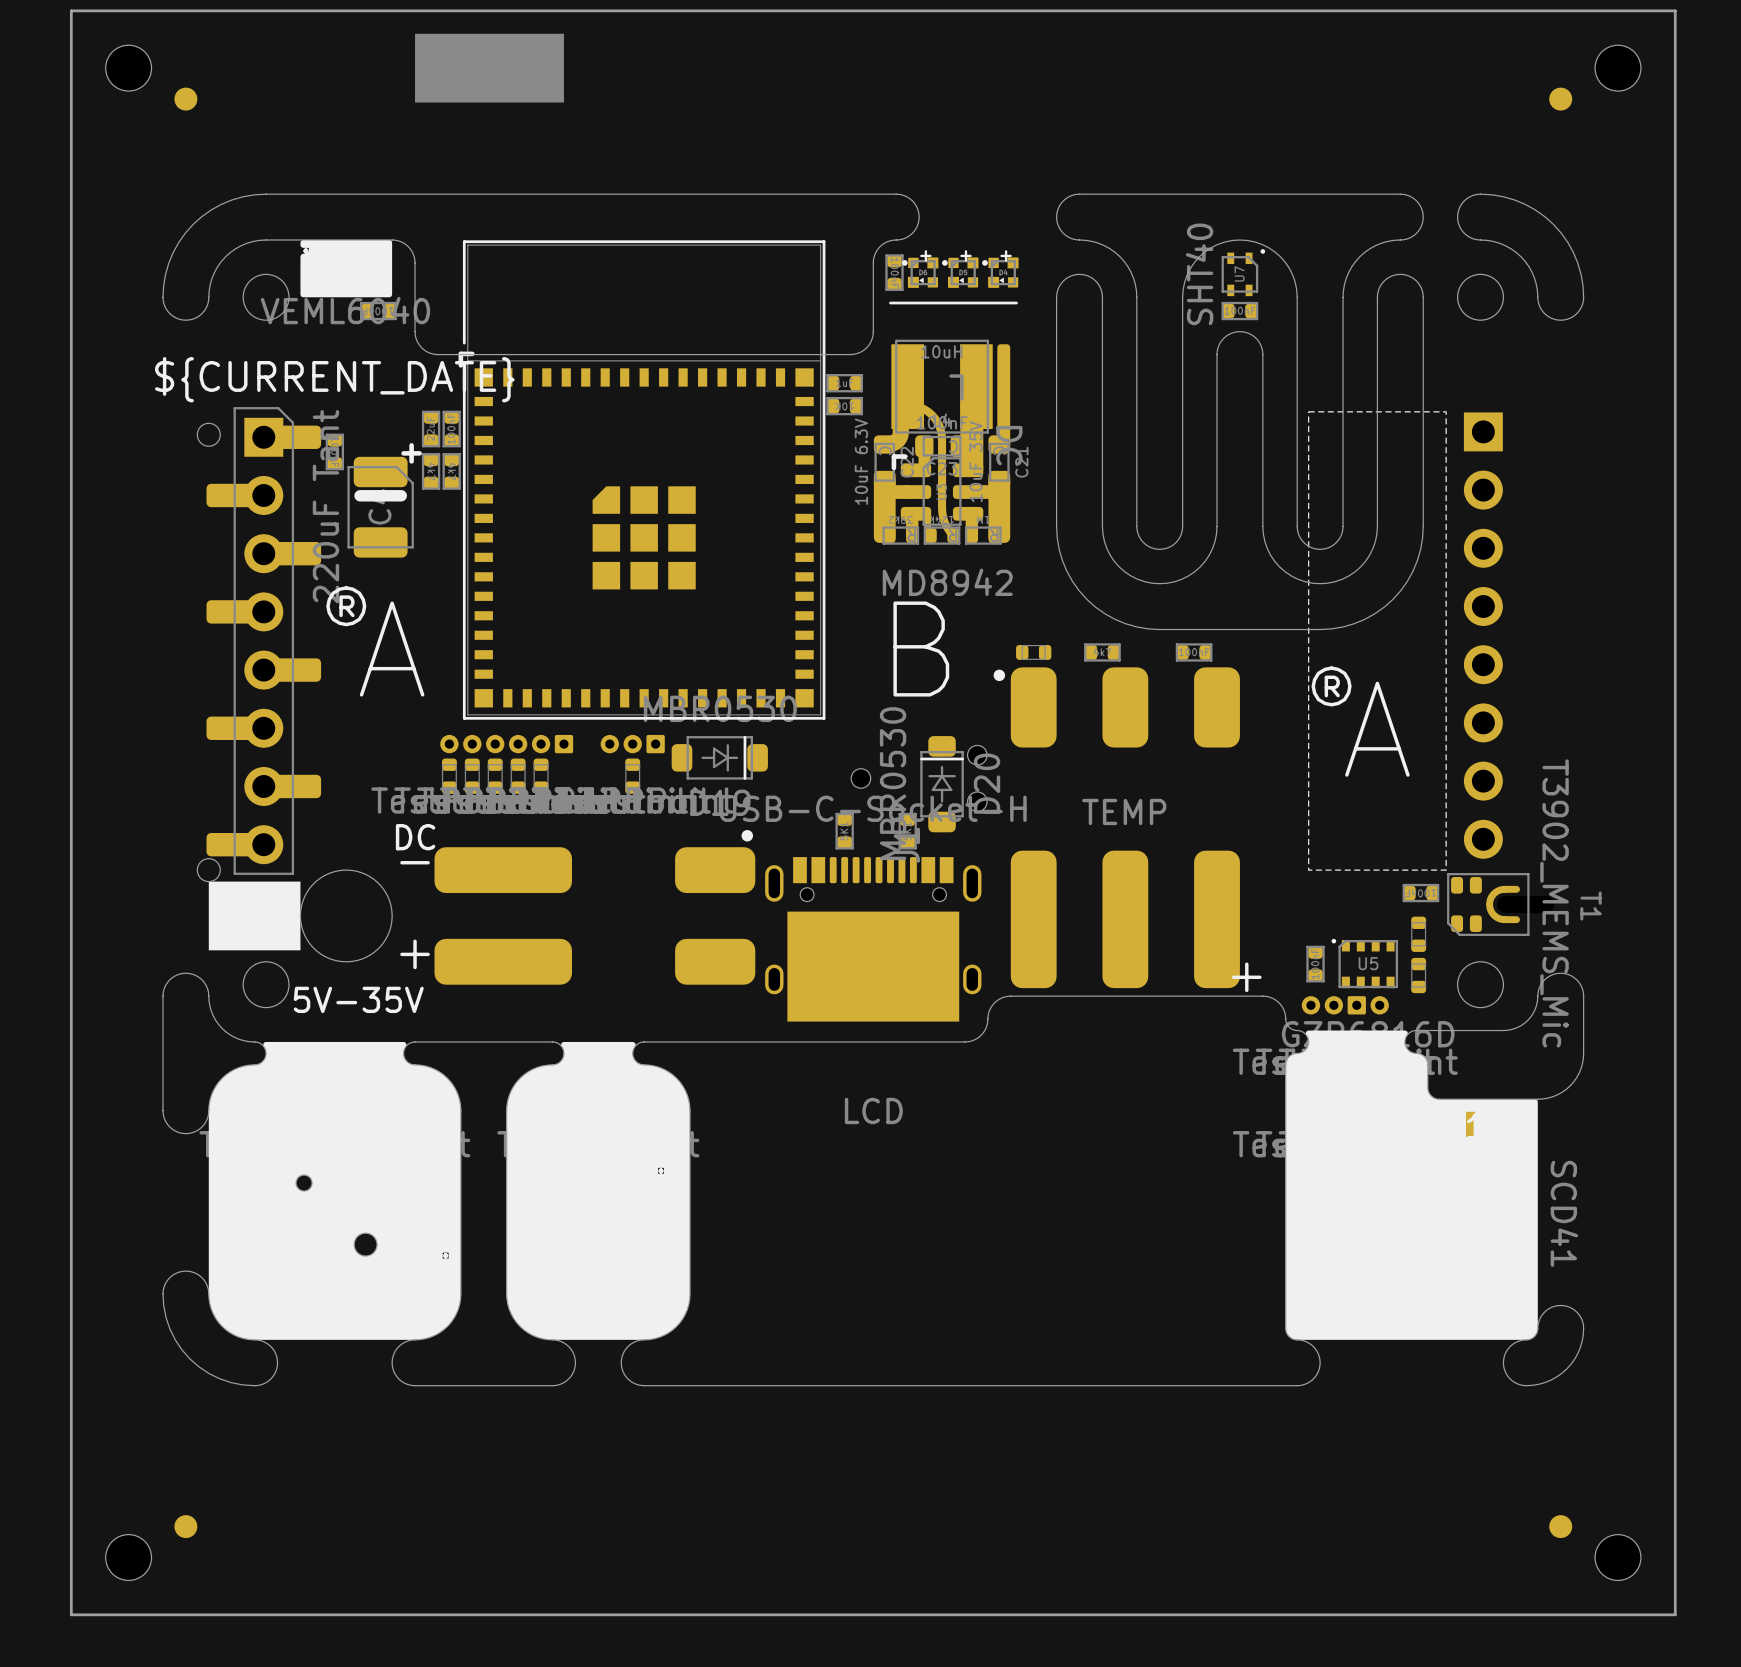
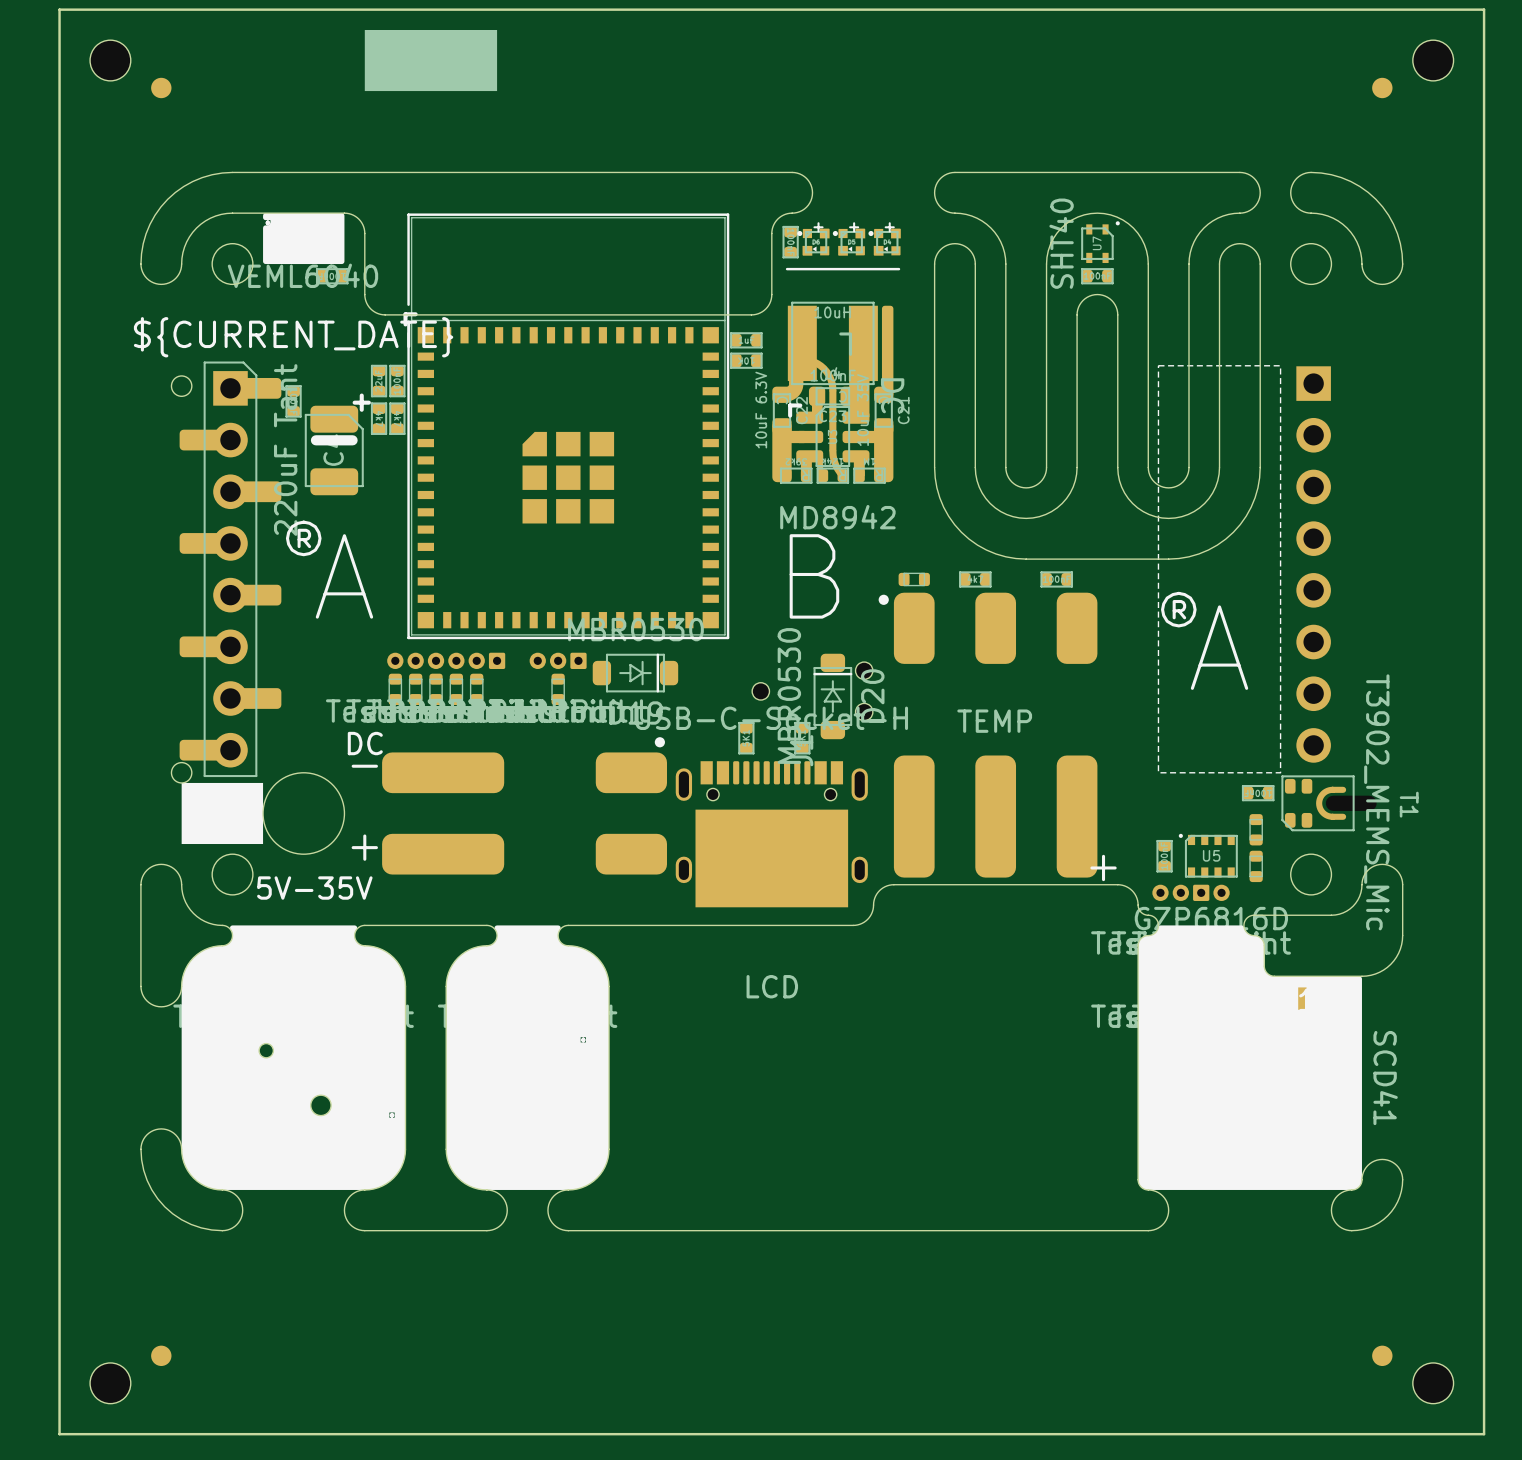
drawing shape: [1285, 1030, 1538, 1340] -> [1138, 925, 1362, 1190]

